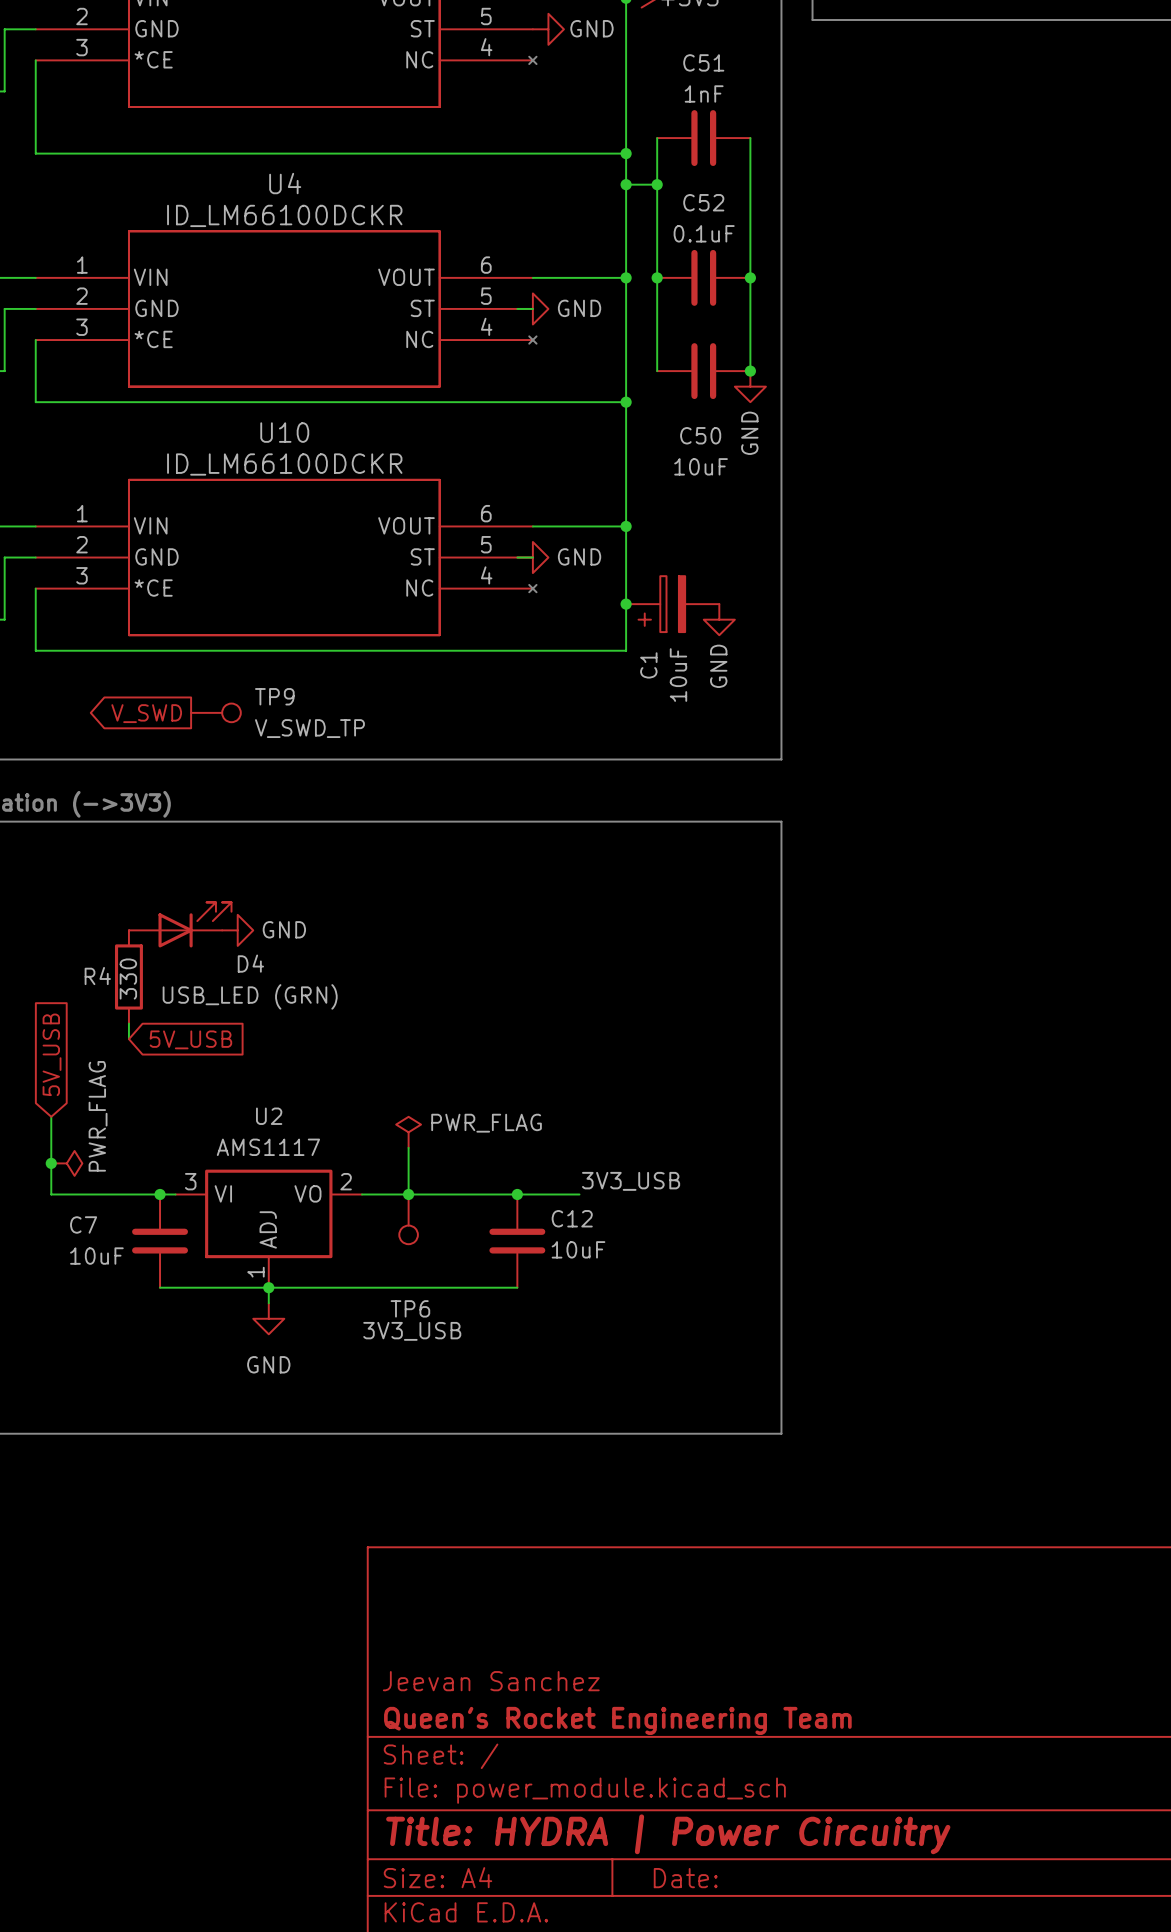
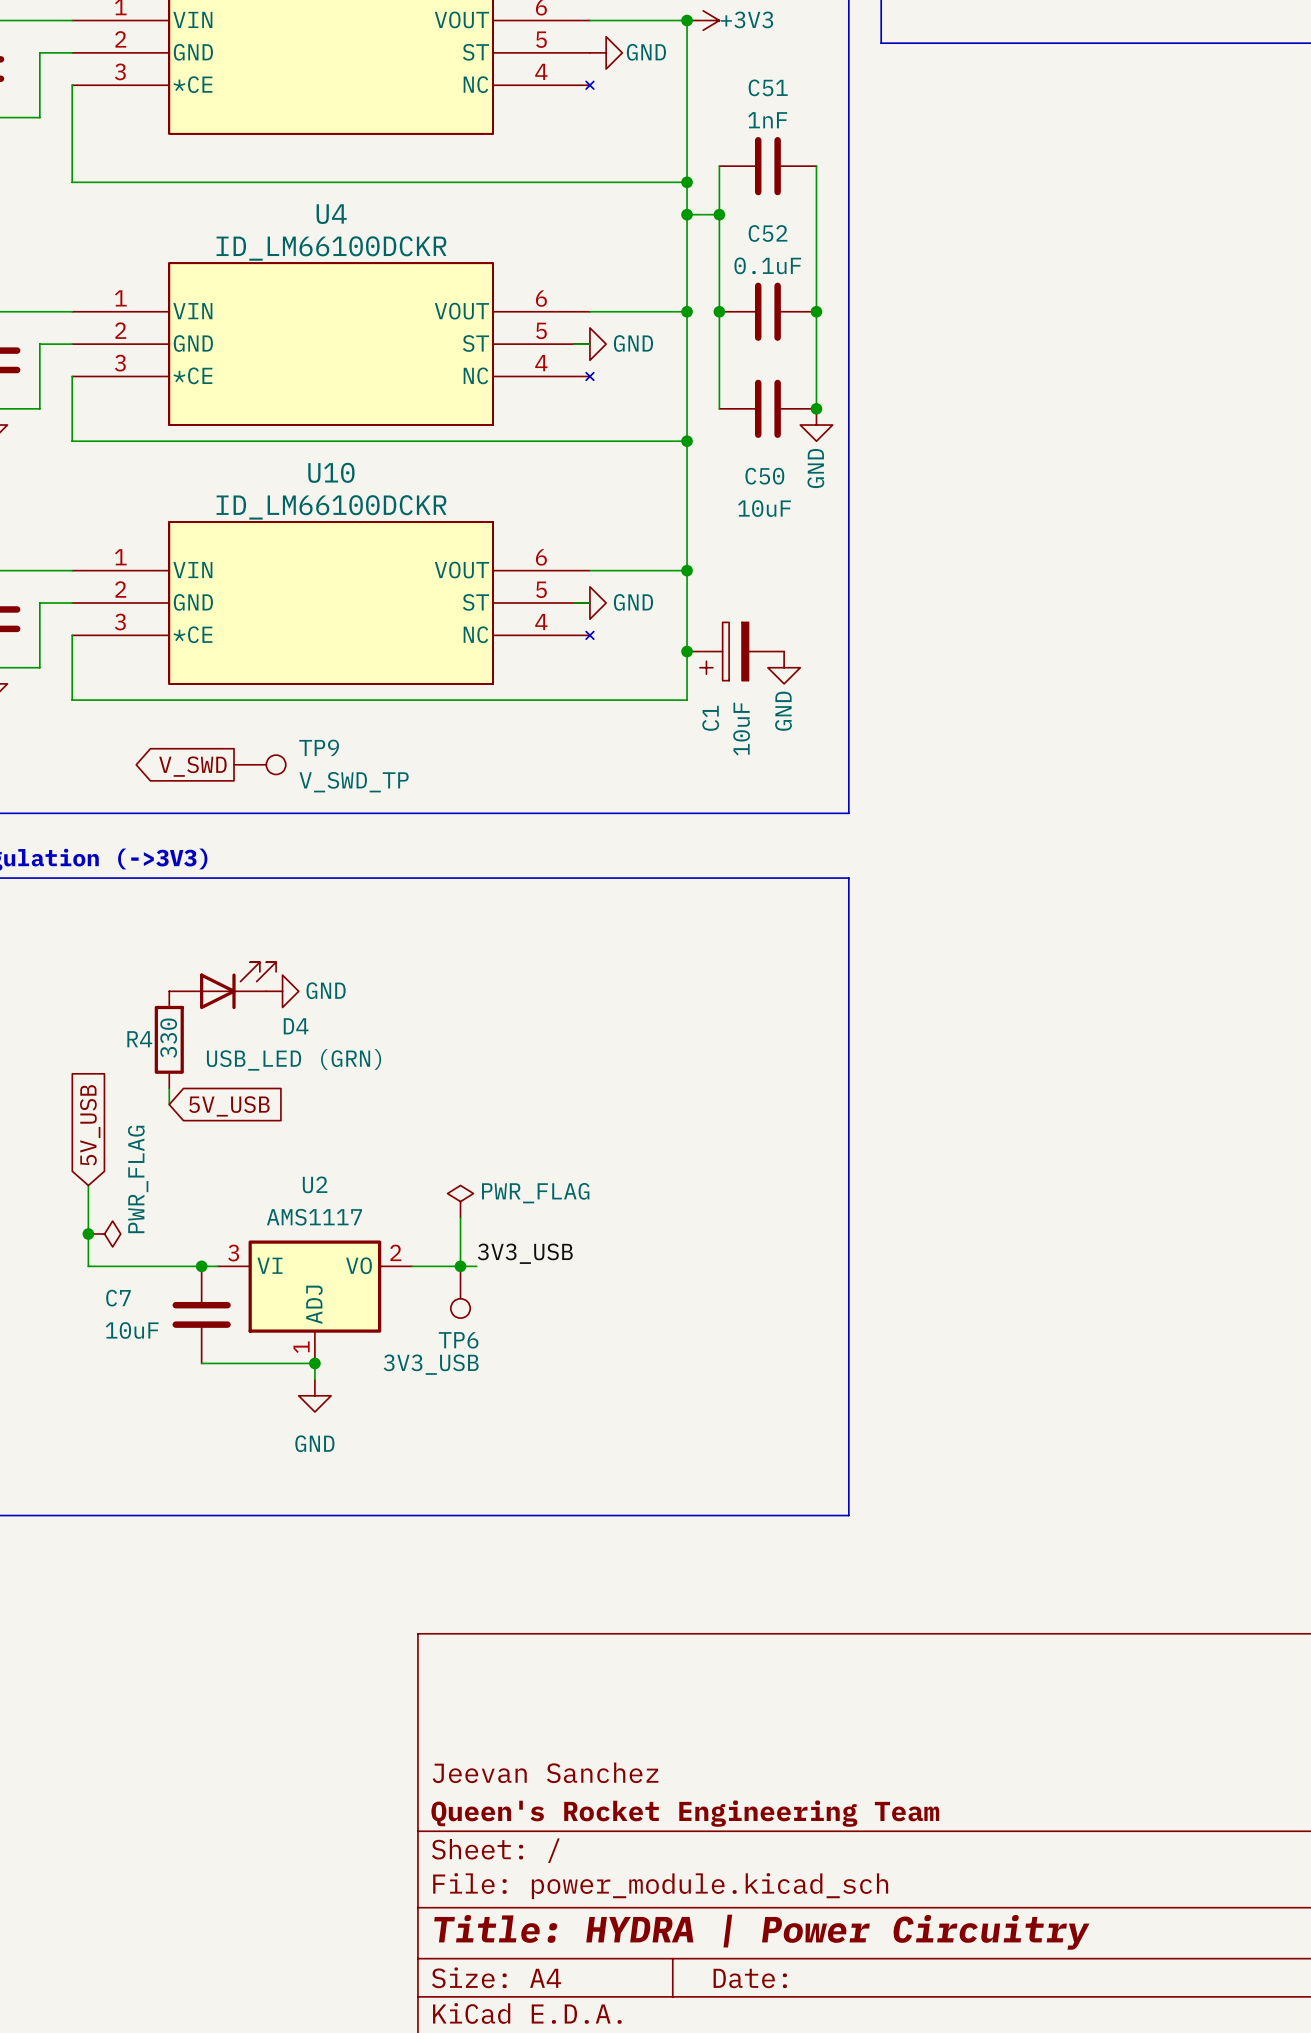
label position: 3V3_USB (631, 1181) -> 3V3_USB (525, 1253)
wire: (424, 1194) (579, 1194) -> none
junction: (517, 1194) -> none
C12: 10uF (517, 1241) -> none
wire: (268, 1287) (517, 1287) -> none
TP6 name position: TP6 (410, 1308) -> TP6 (458, 1340)
TP6 value position: 3V3_USB (412, 1331) -> 3V3_USB (431, 1364)

